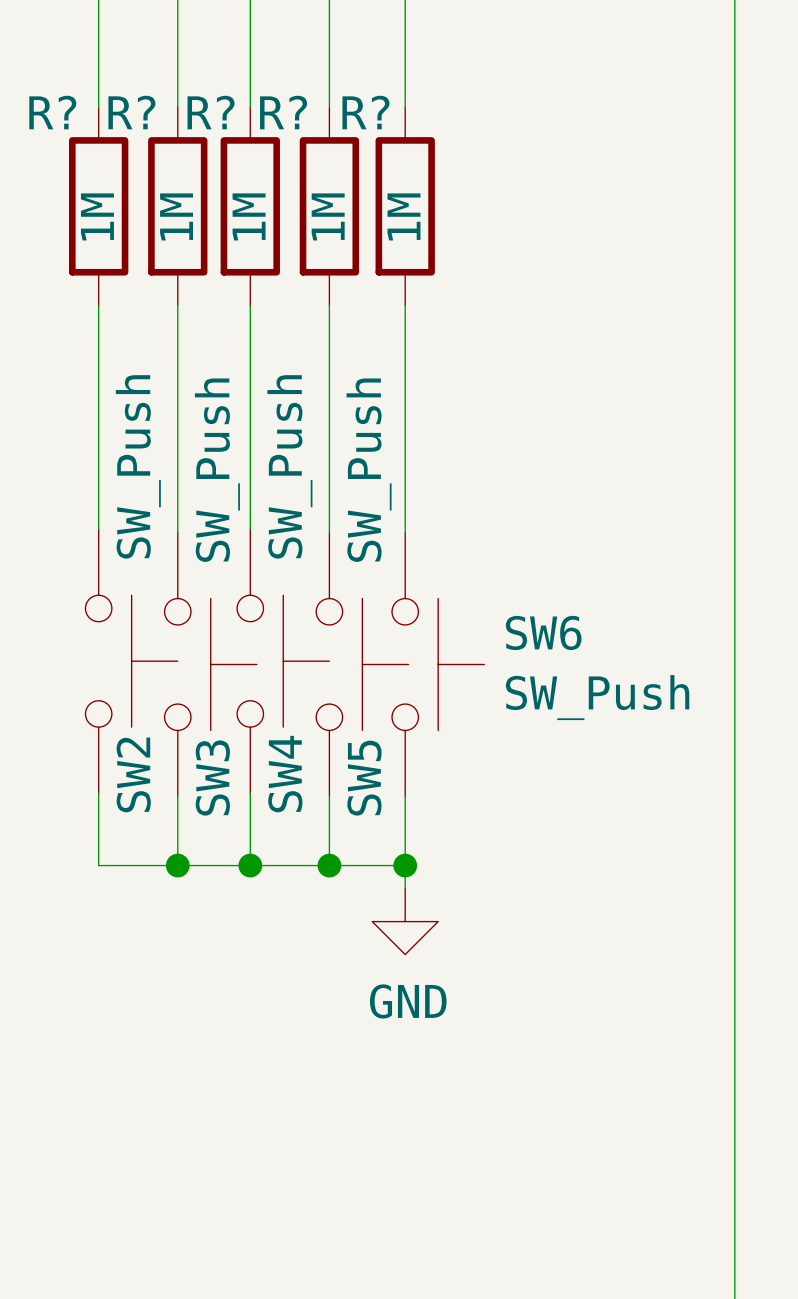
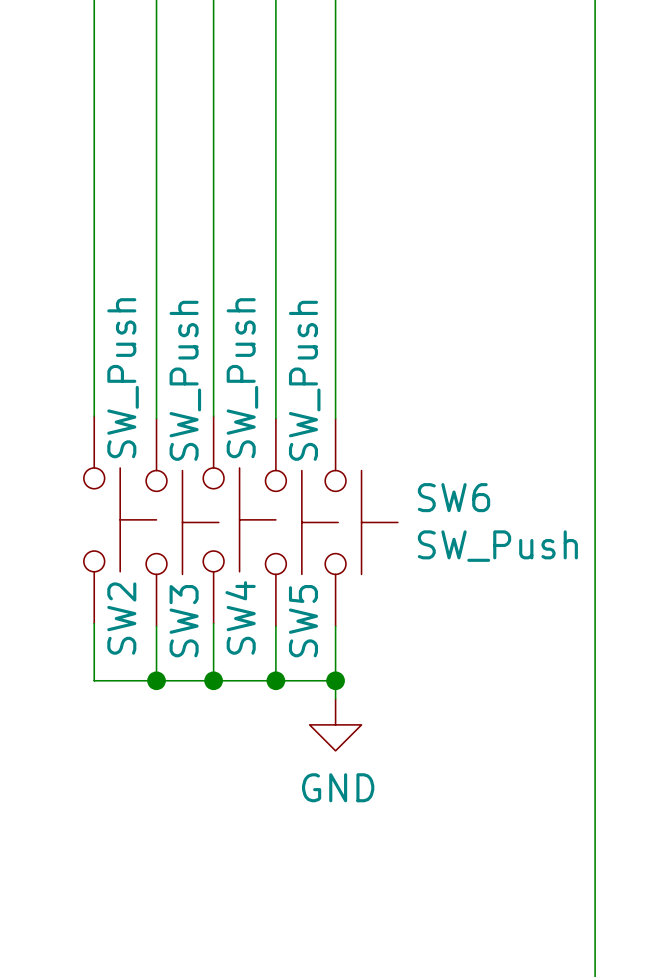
wire: none -> (94, 83) (94, 239)
wire: none -> (156, 83) (156, 239)
wire: none -> (213, 83) (213, 239)
wire: none -> (275, 83) (275, 239)
wire: none -> (335, 83) (335, 239)
R?: 1M (98, 206) -> none
R?: 1M (177, 206) -> none
R?: 1M (250, 206) -> none
R?: 1M (329, 206) -> none
R?: 1M (405, 206) -> none

